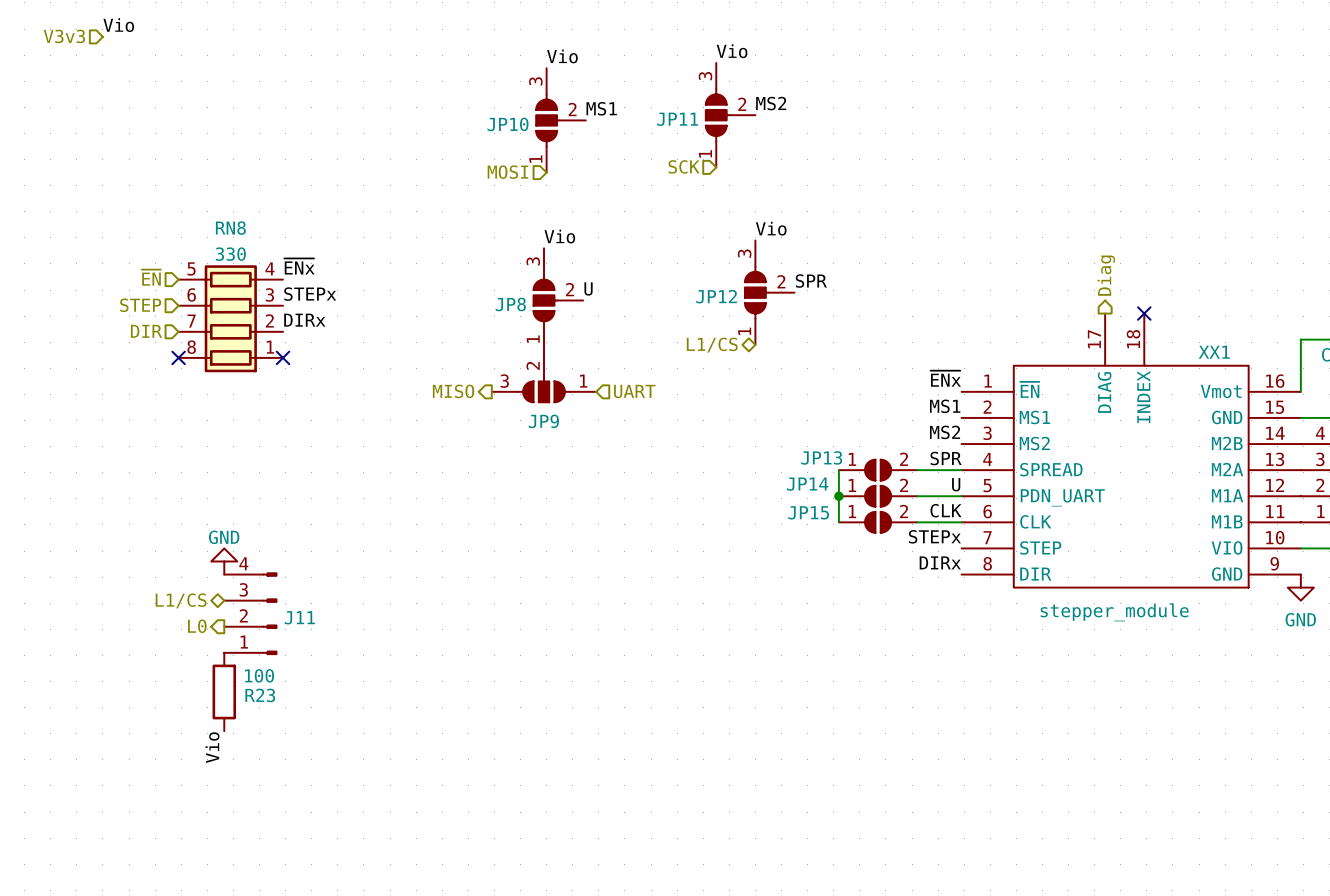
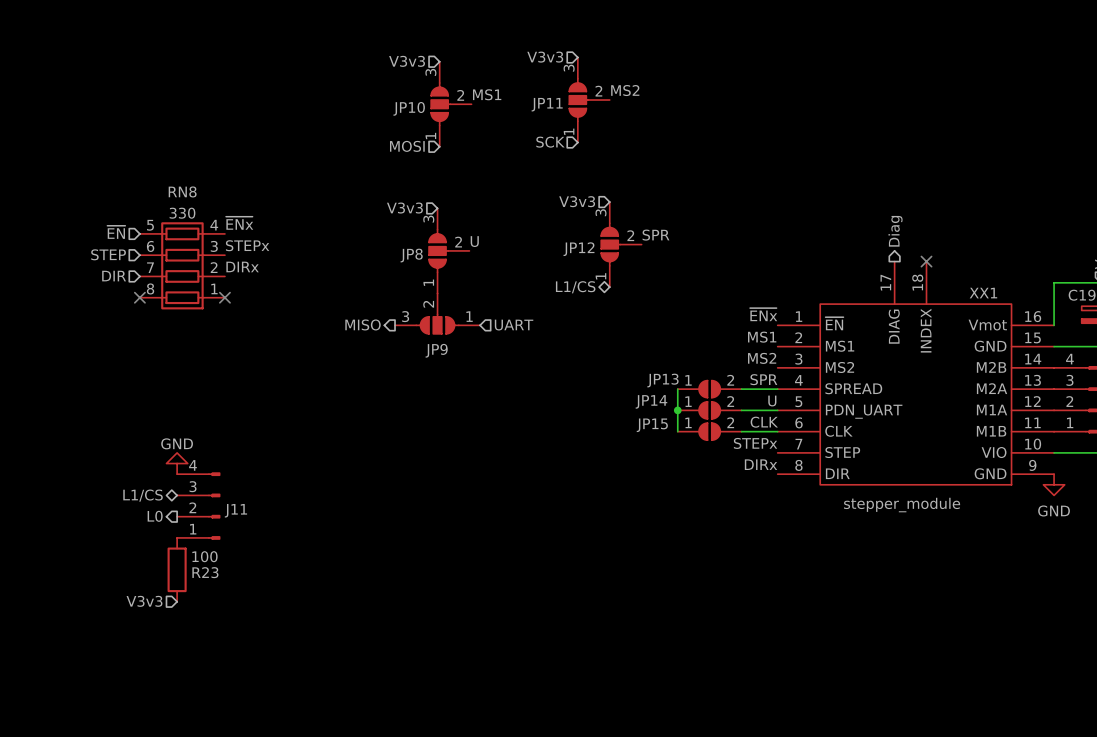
label: Vio (118, 25) -> none
hierarchical label: V3v3 (64, 36) -> none
label: Vio (732, 51) -> none
label: Vio (562, 56) -> none
hierarchical label: none -> V3v3 (545, 57)
hierarchical label: none -> V3v3 (407, 61)
label: Vio (771, 228) -> none
label: Vio (559, 236) -> none
hierarchical label: none -> V3v3 (577, 201)
hierarchical label: none -> V3v3 (404, 208)
hierarchical label: none -> V3v3 (144, 601)
label: Vio (212, 747) -> none

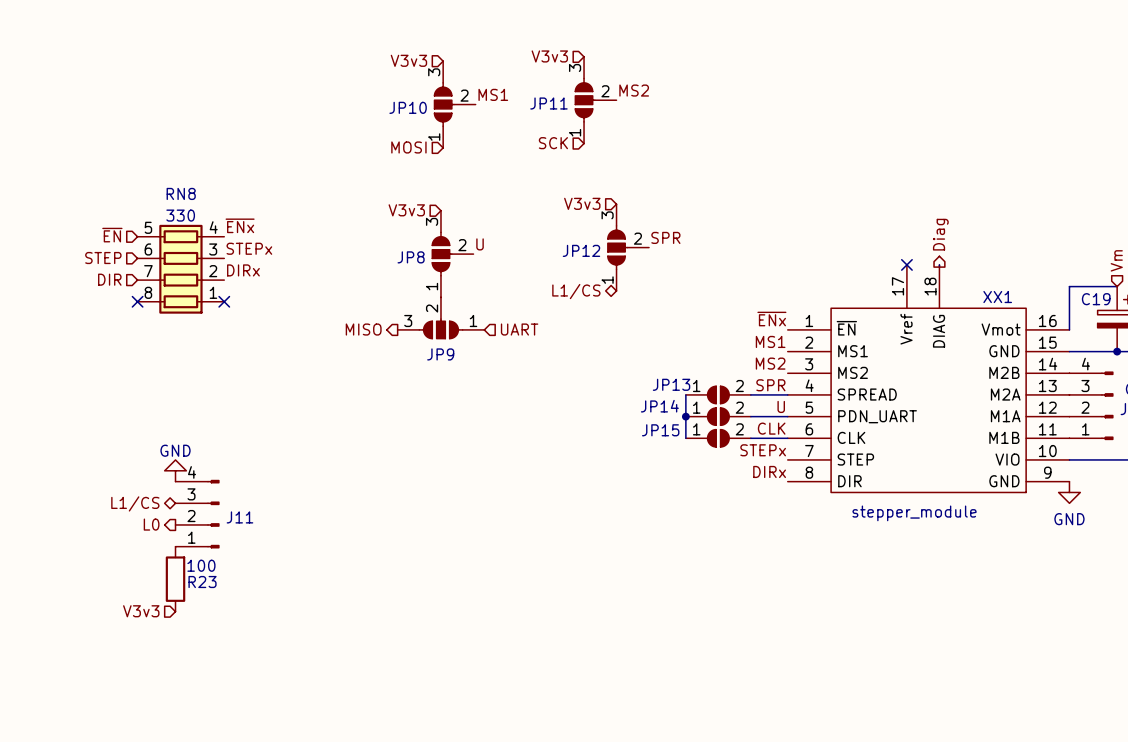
hierarchical label position: Diag (895, 231) -> Diag (940, 234)
no-connect mark position: (926, 261) -> (906, 264)
XX1 pin name: DIAG (894, 326) -> Vref (906, 329)
XX1 pin name: INDEX (926, 330) -> DIAG (939, 331)

